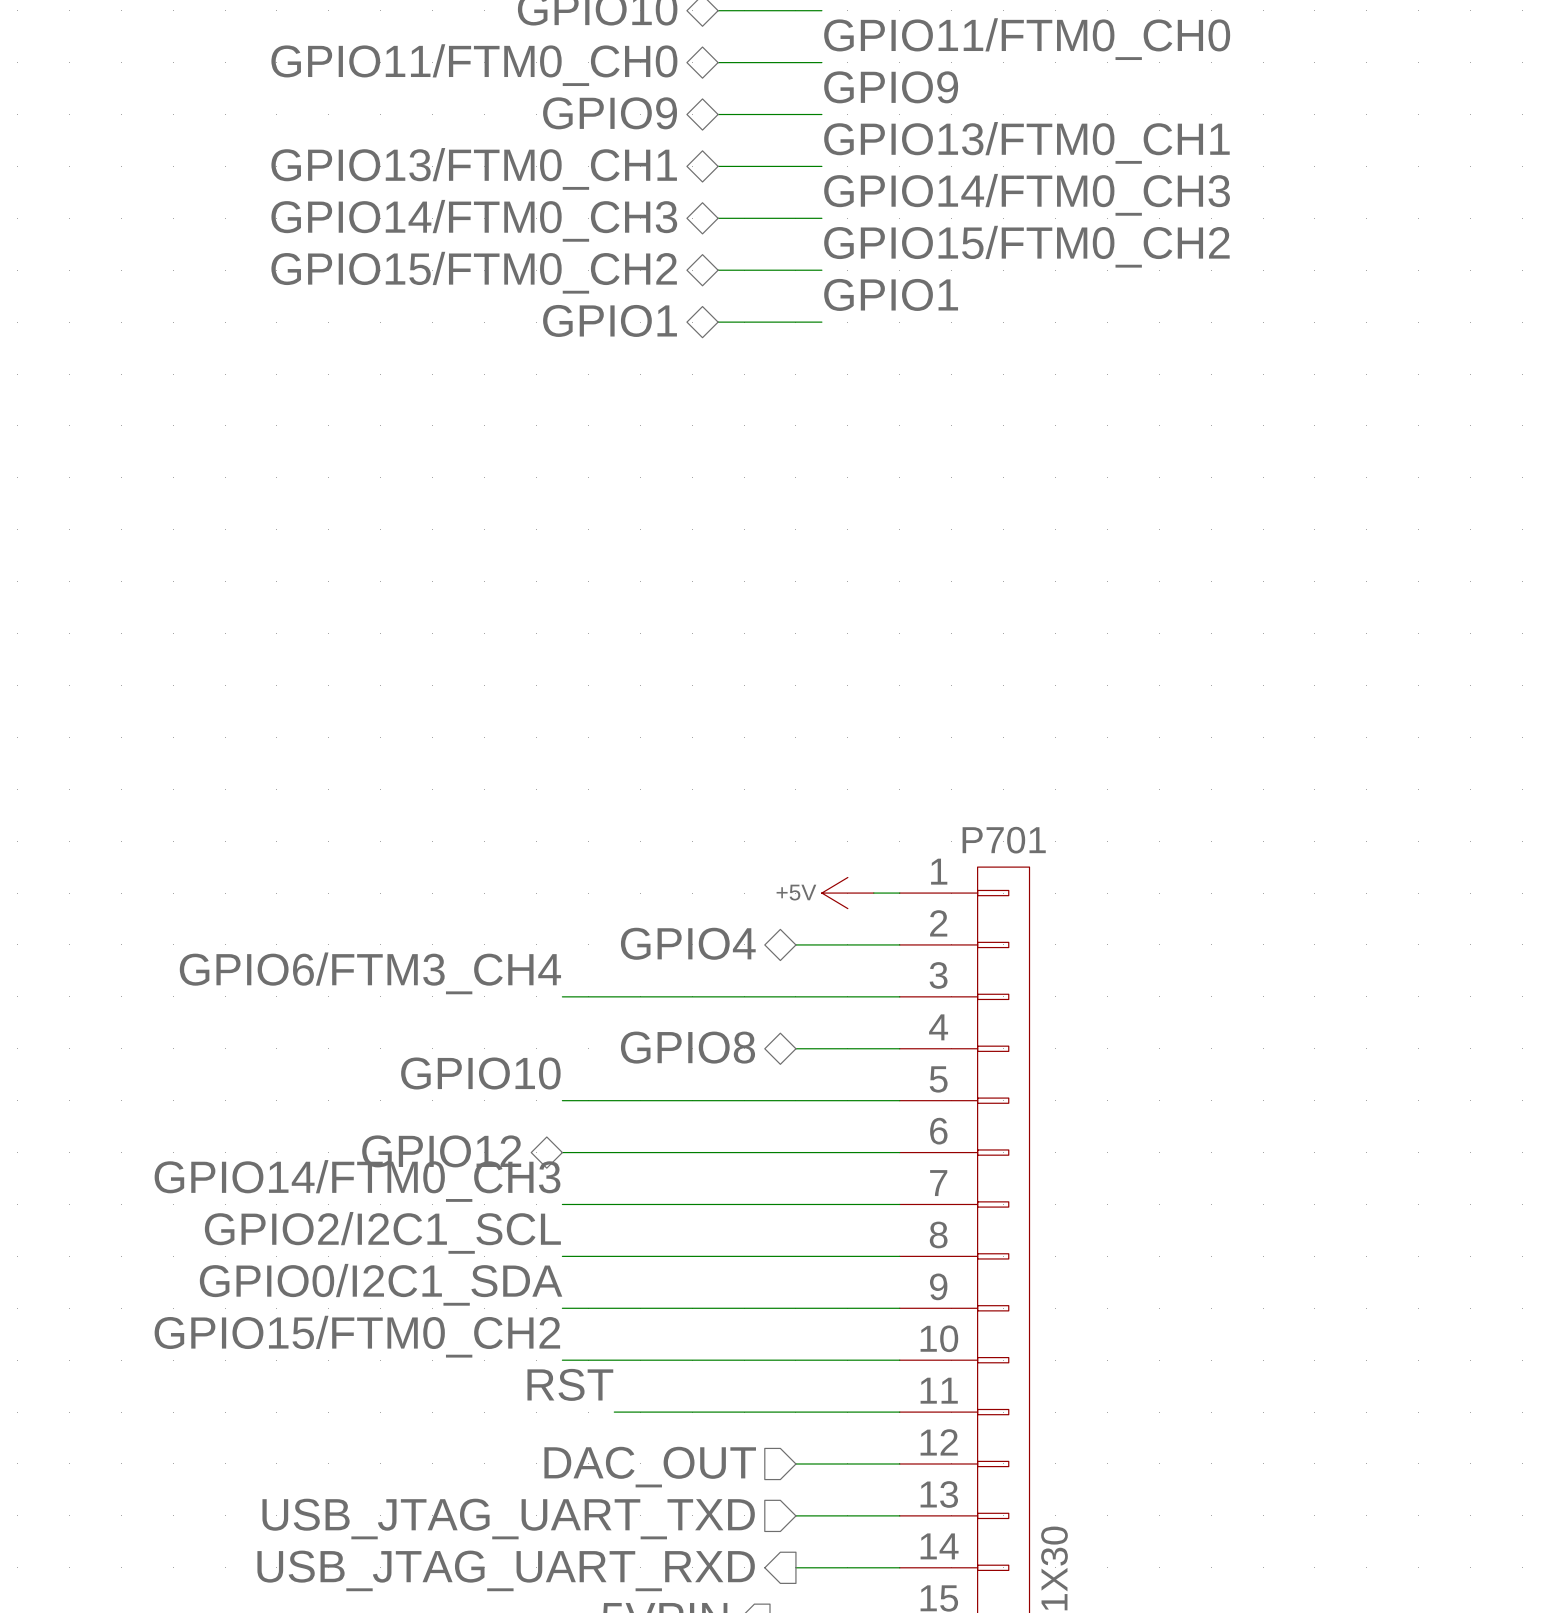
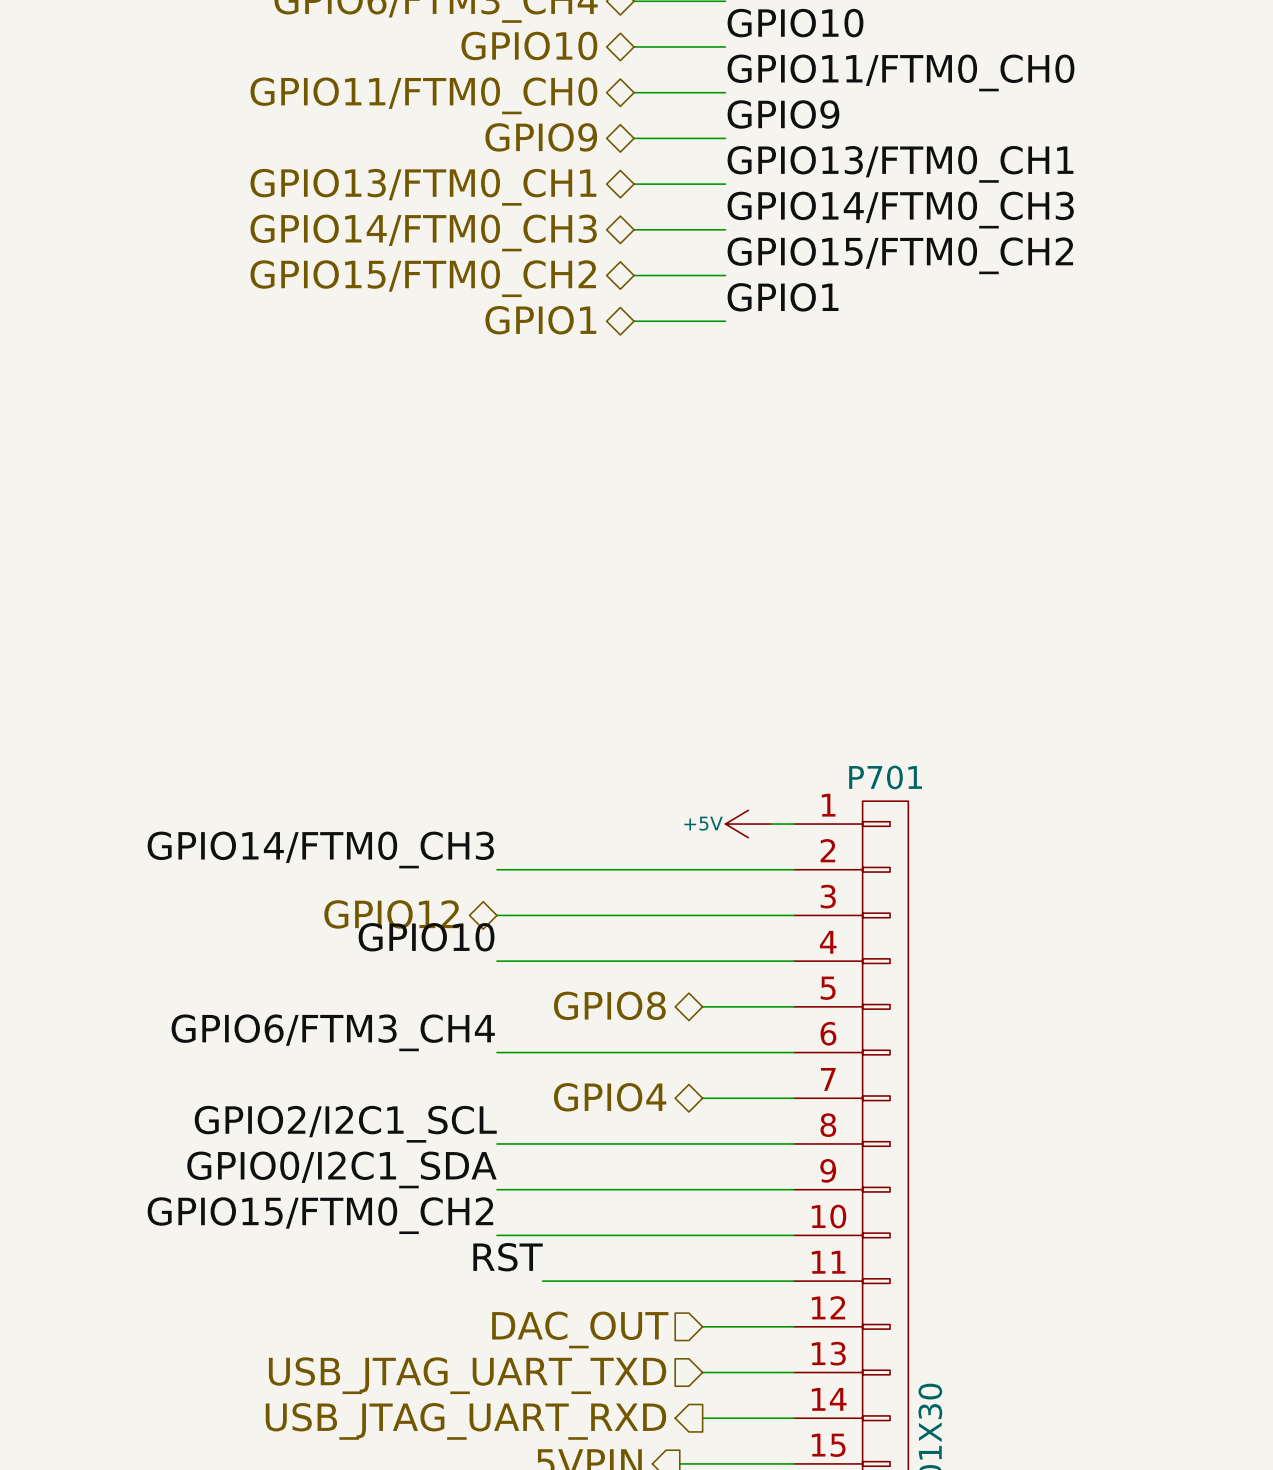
hierarchical label position: GPIO4 (688, 943) -> GPIO4 (610, 1097)
label position: GPIO6/FTM3_CH4 (370, 973) -> GPIO6/FTM3_CH4 (333, 1032)
hierarchical label position: GPIO8 (687, 1047) -> GPIO8 (609, 1005)
label position: GPIO10 (480, 1073) -> GPIO10 (426, 937)
wire: (562, 1100) (795, 1100) -> (496, 961) (702, 961)
hierarchical label position: GPIO12 (441, 1151) -> GPIO12 (391, 914)
label position: GPIO14/FTM0_CH3 (357, 1180) -> GPIO14/FTM0_CH3 (320, 849)
wire: (562, 1204) (795, 1204) -> (496, 869) (702, 869)

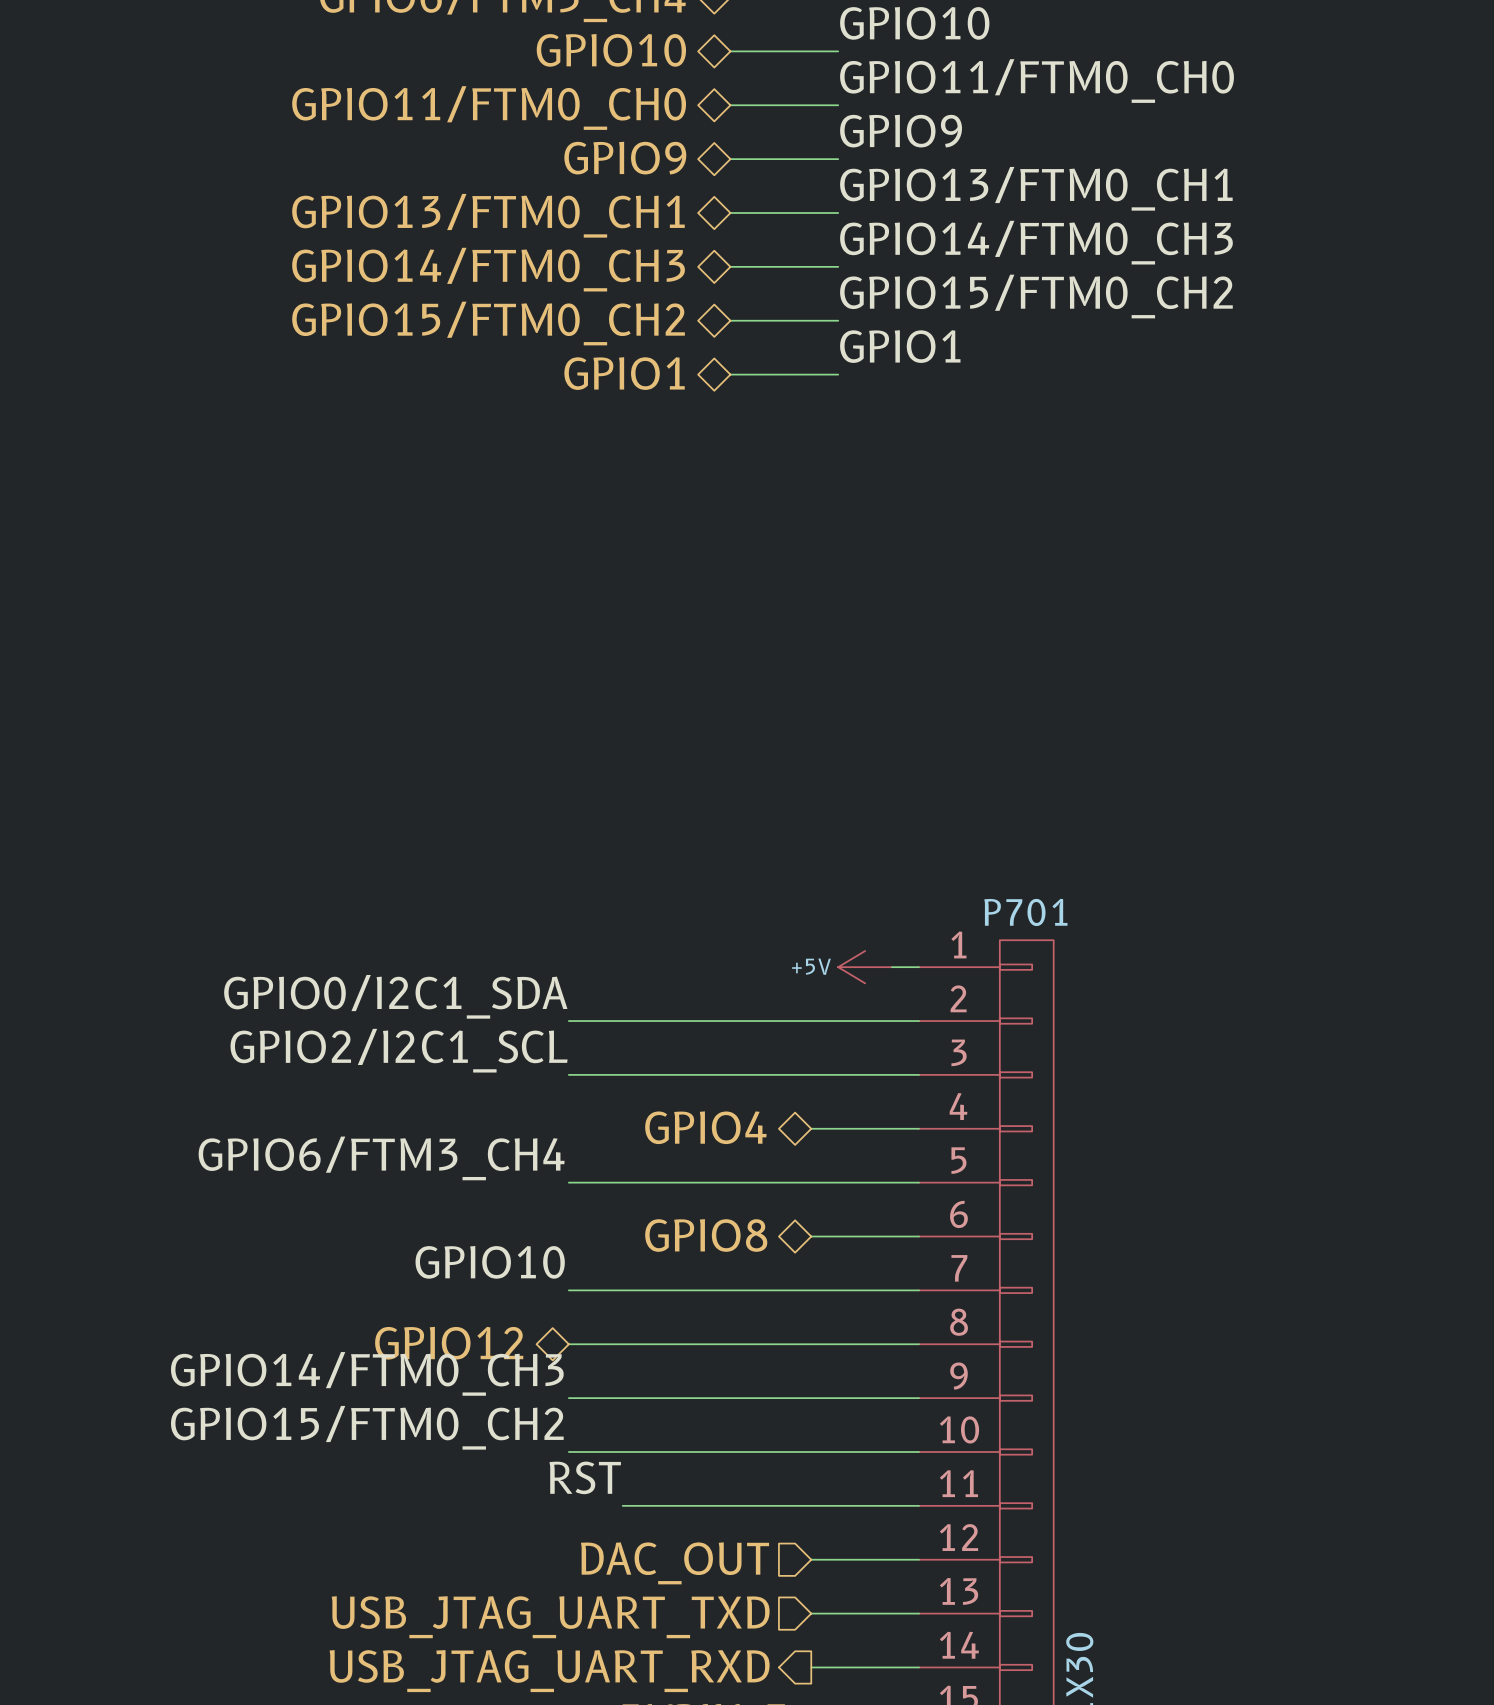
label: GPIO14/FTM0_CH3 (320, 849) -> GPIO0/I2C1_SDA (395, 996)
hierarchical label position: GPIO12 (391, 914) -> GPIO12 (449, 1343)
label position: GPIO10 (426, 937) -> GPIO10 (490, 1262)
wire: (496, 961) (702, 961) -> (568, 1290) (811, 1290)
hierarchical label position: GPIO8 (609, 1005) -> GPIO8 (706, 1235)
label position: GPIO6/FTM3_CH4 (333, 1032) -> GPIO6/FTM3_CH4 (381, 1158)
wire: (496, 1052) (702, 1052) -> (568, 1182) (811, 1182)
hierarchical label position: GPIO4 (610, 1097) -> GPIO4 (705, 1127)
label position: GPIO2/I2C1_SCL (345, 1124) -> GPIO2/I2C1_SCL (399, 1050)
label: GPIO0/I2C1_SDA (341, 1169) -> GPIO14/FTM0_CH3 (367, 1373)

